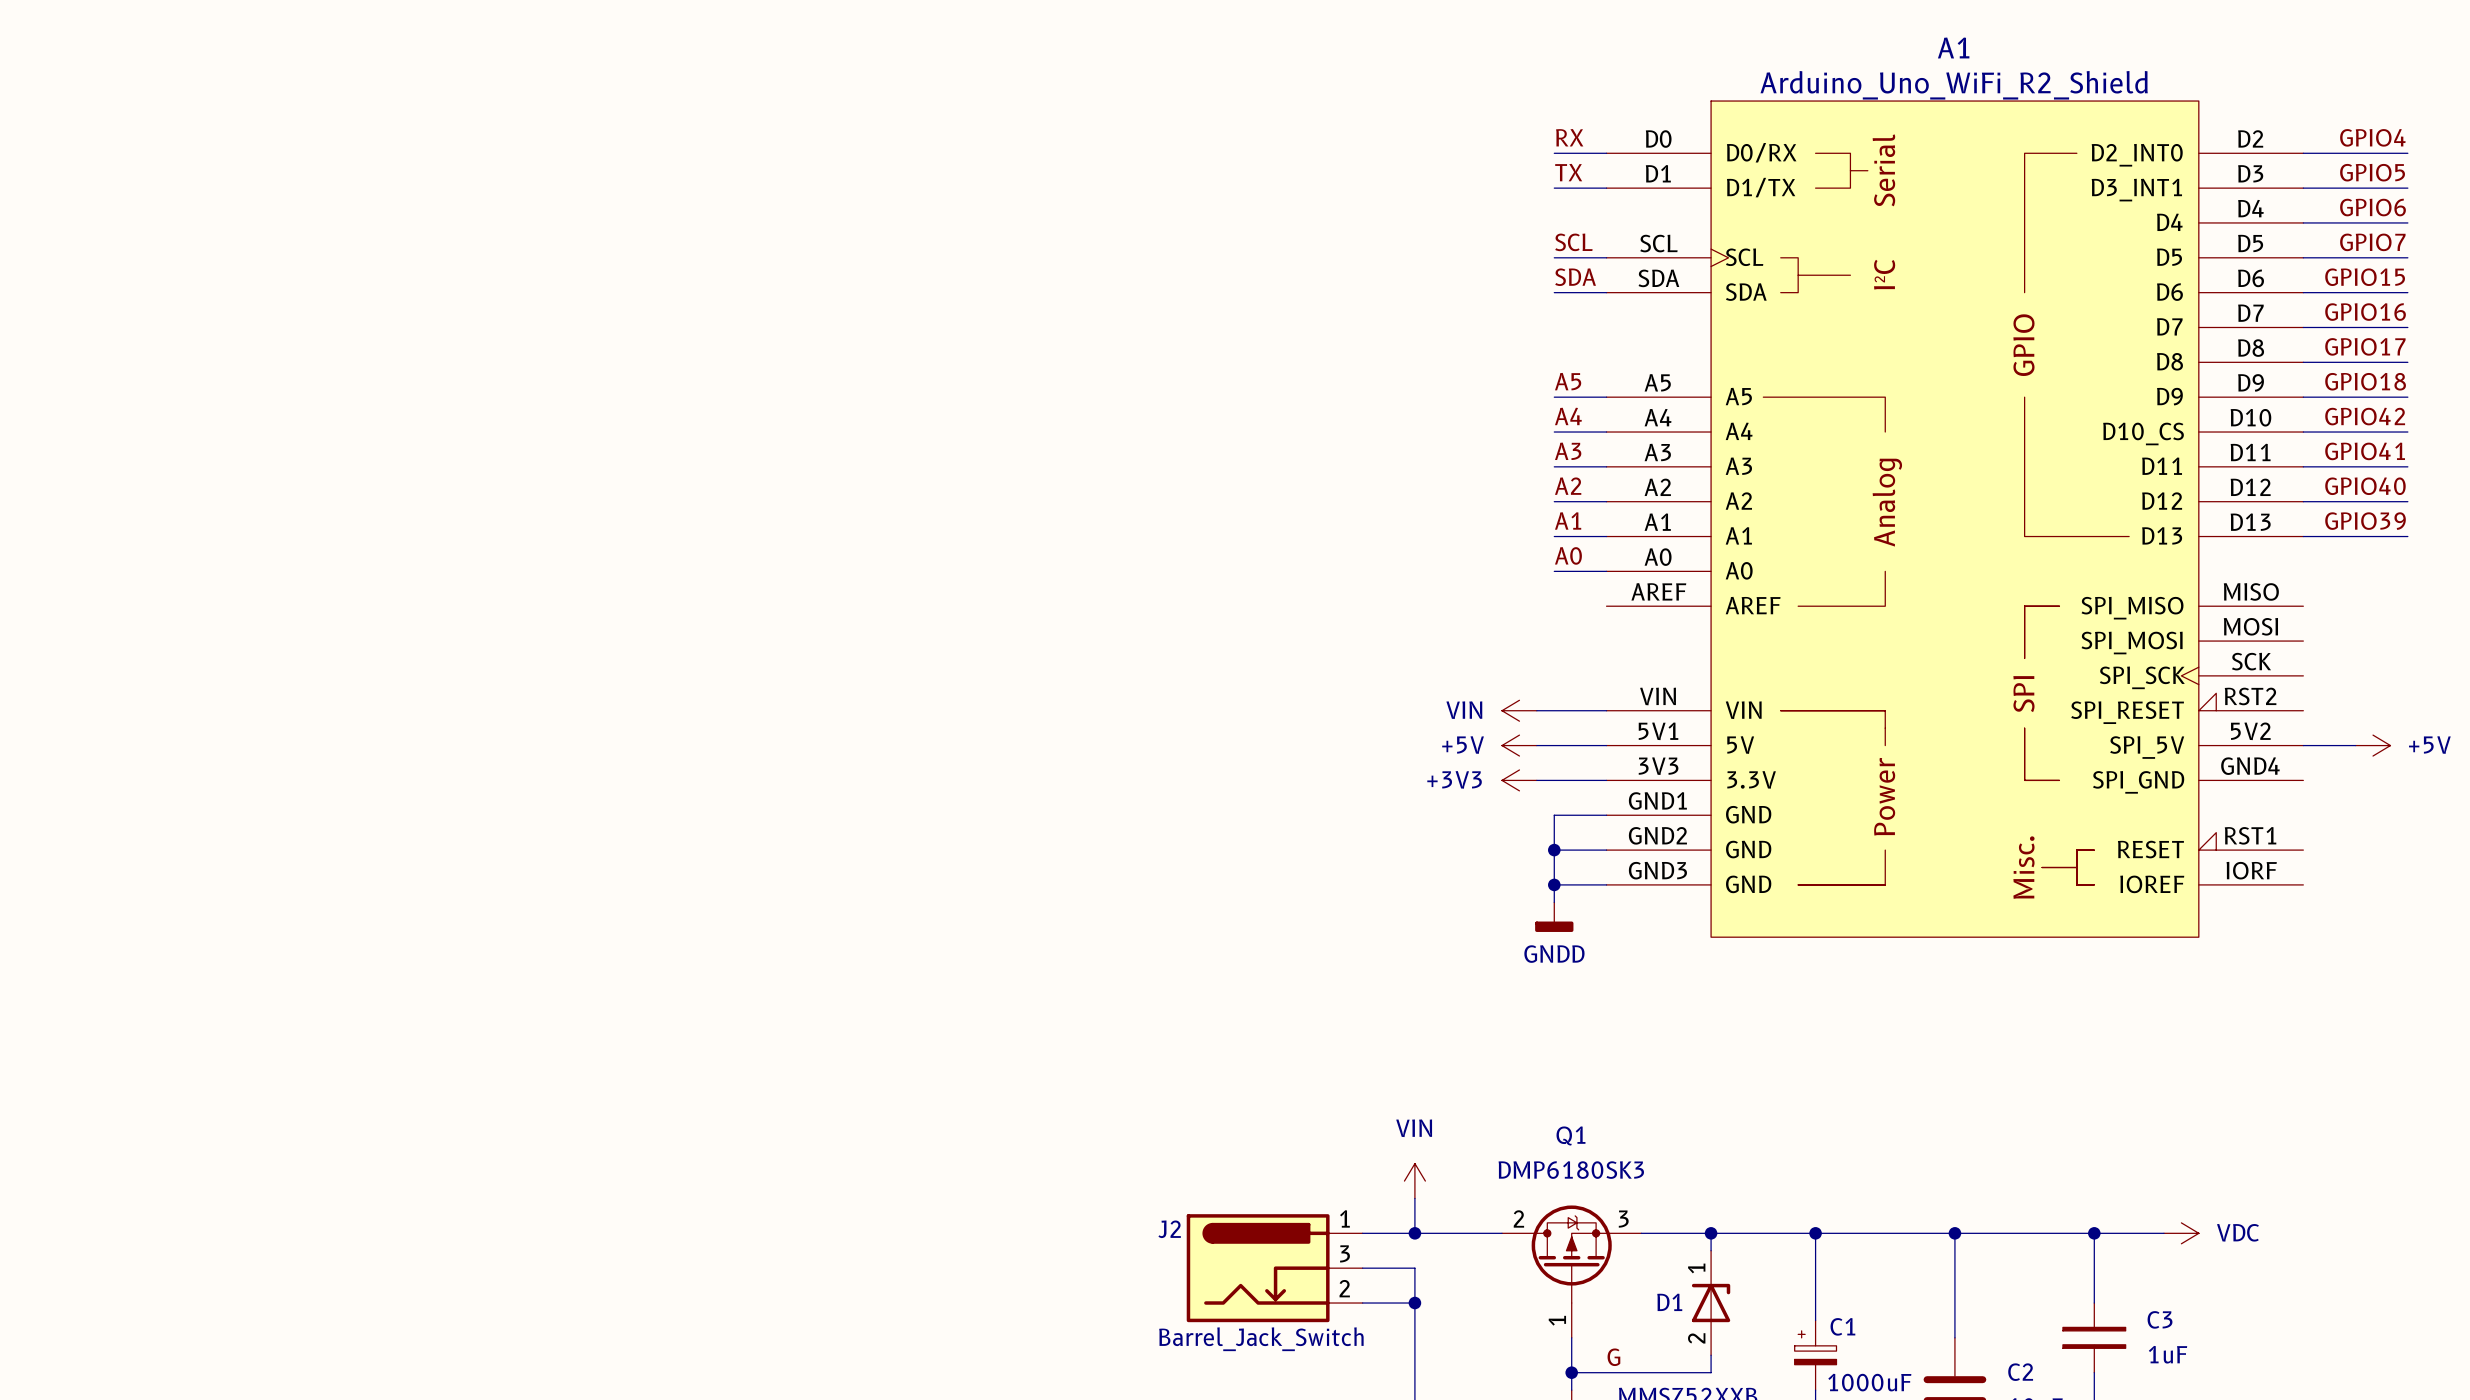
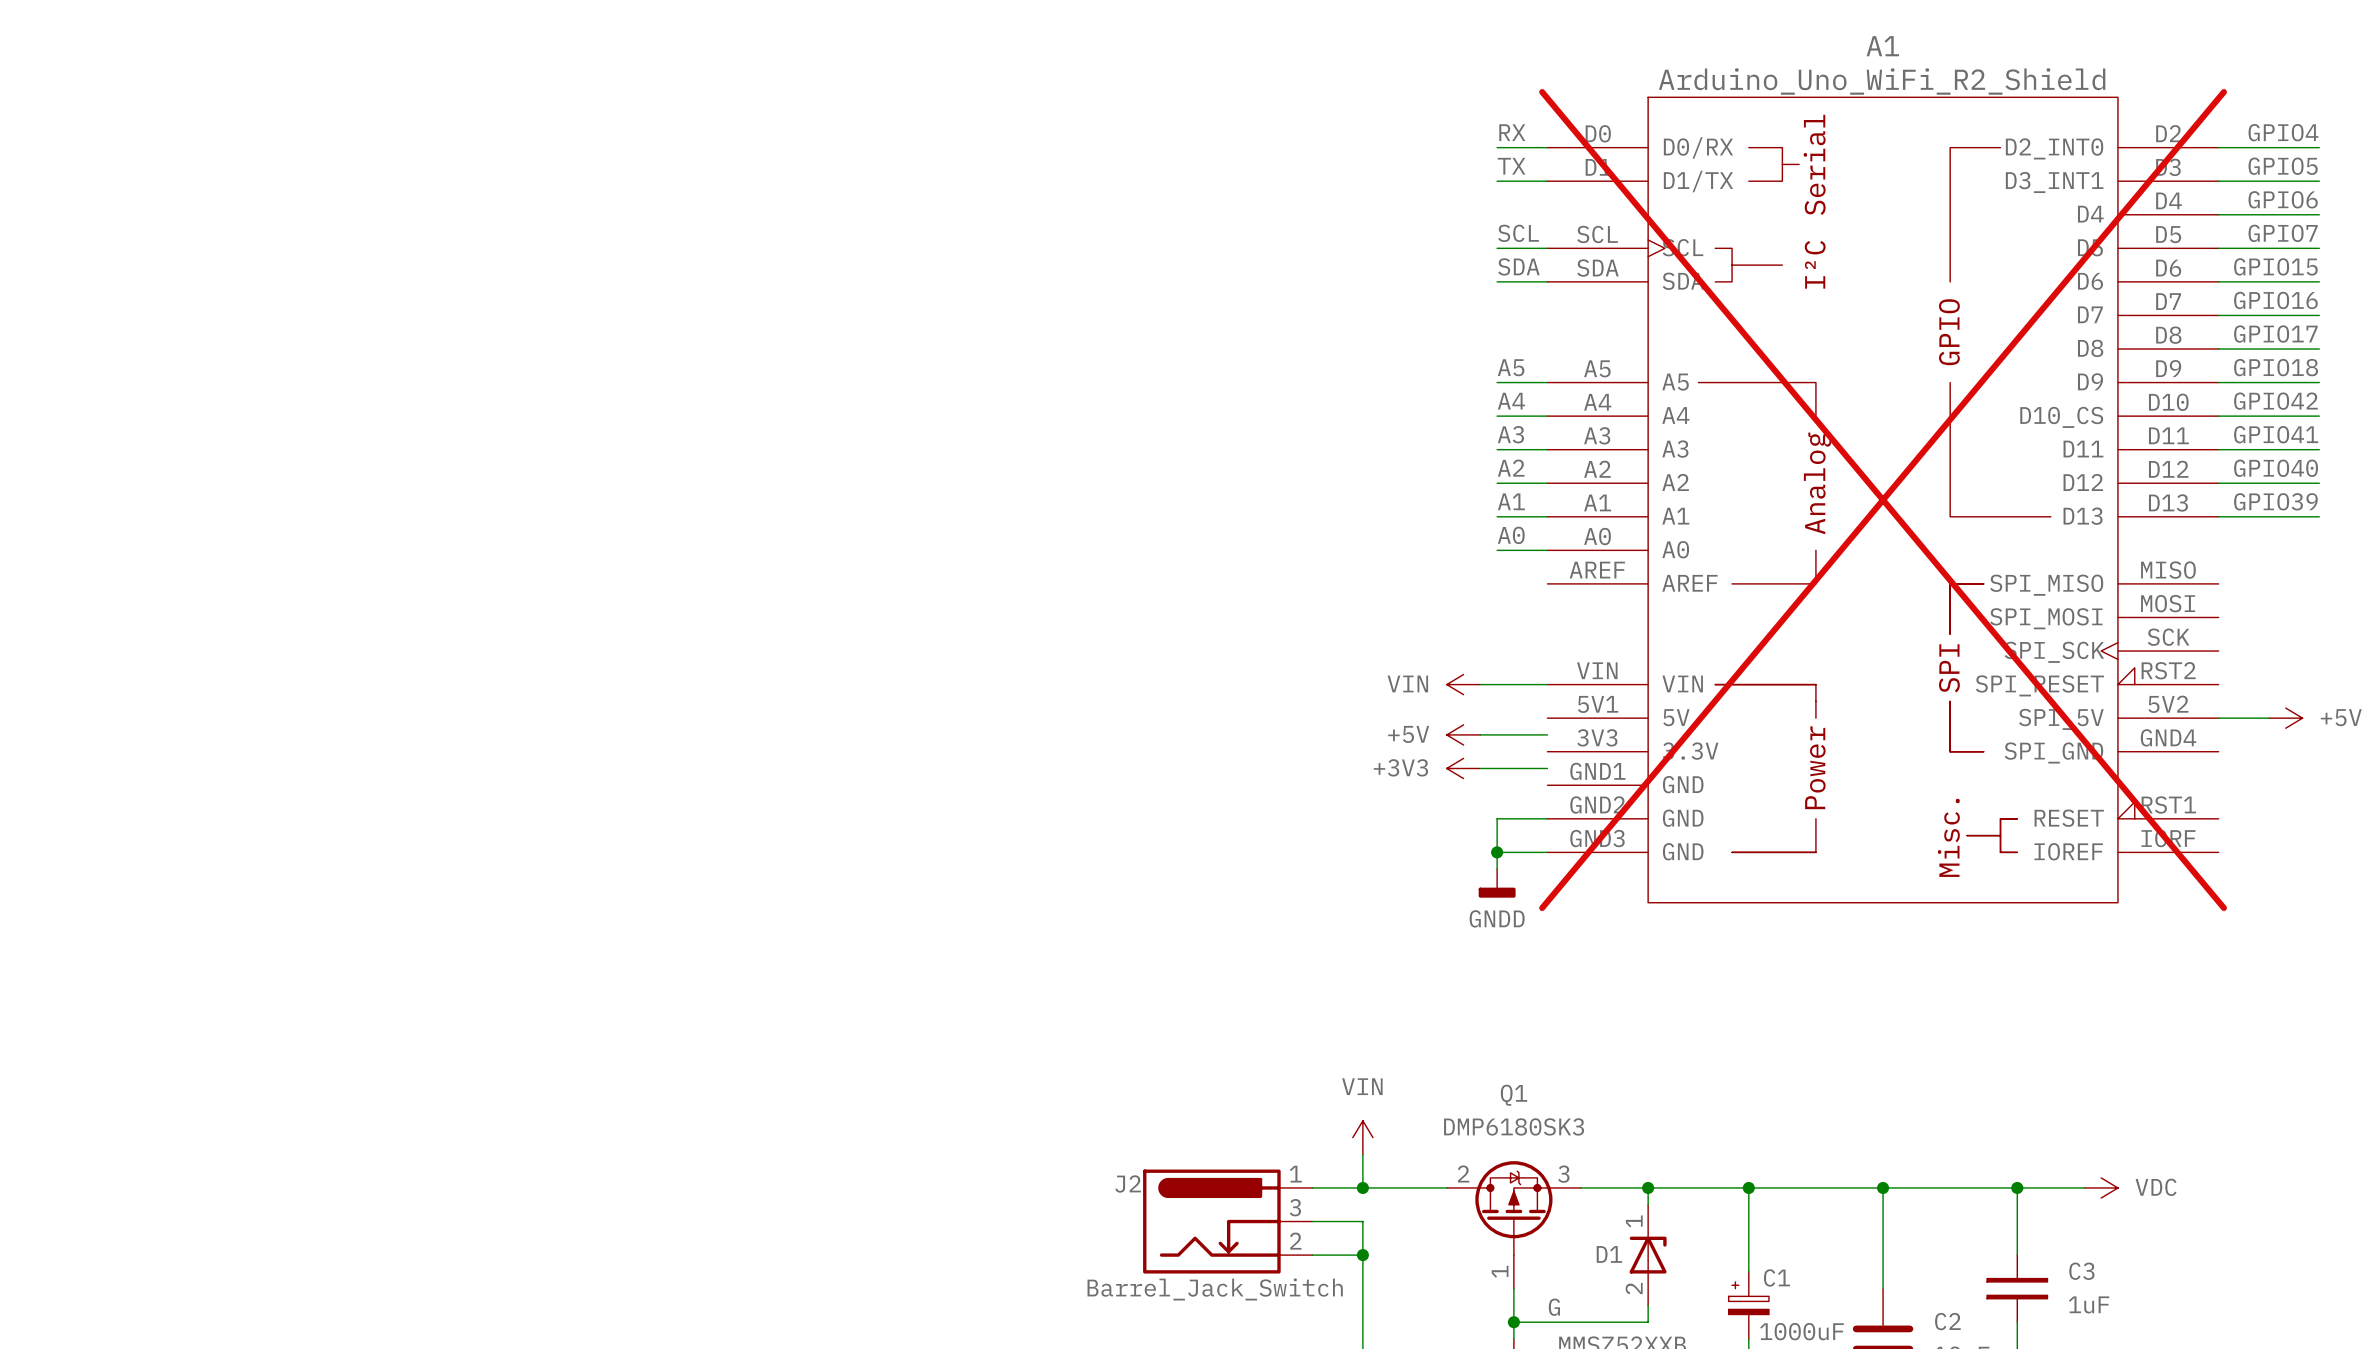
A1 do-not-place cross: none -> (1883, 500)
power symbol position: +5V (1519, 745) -> +5V (1463, 734)
wire: (1536, 745) (1606, 745) -> (1480, 734) (1547, 734)
power symbol position: +3V3 (1519, 780) -> +3V3 (1463, 768)
wire: (1536, 780) (1606, 780) -> (1480, 768) (1547, 768)
wire: (1606, 815) (1554, 815) (1554, 850) -> none
junction: (1554, 850) -> none

